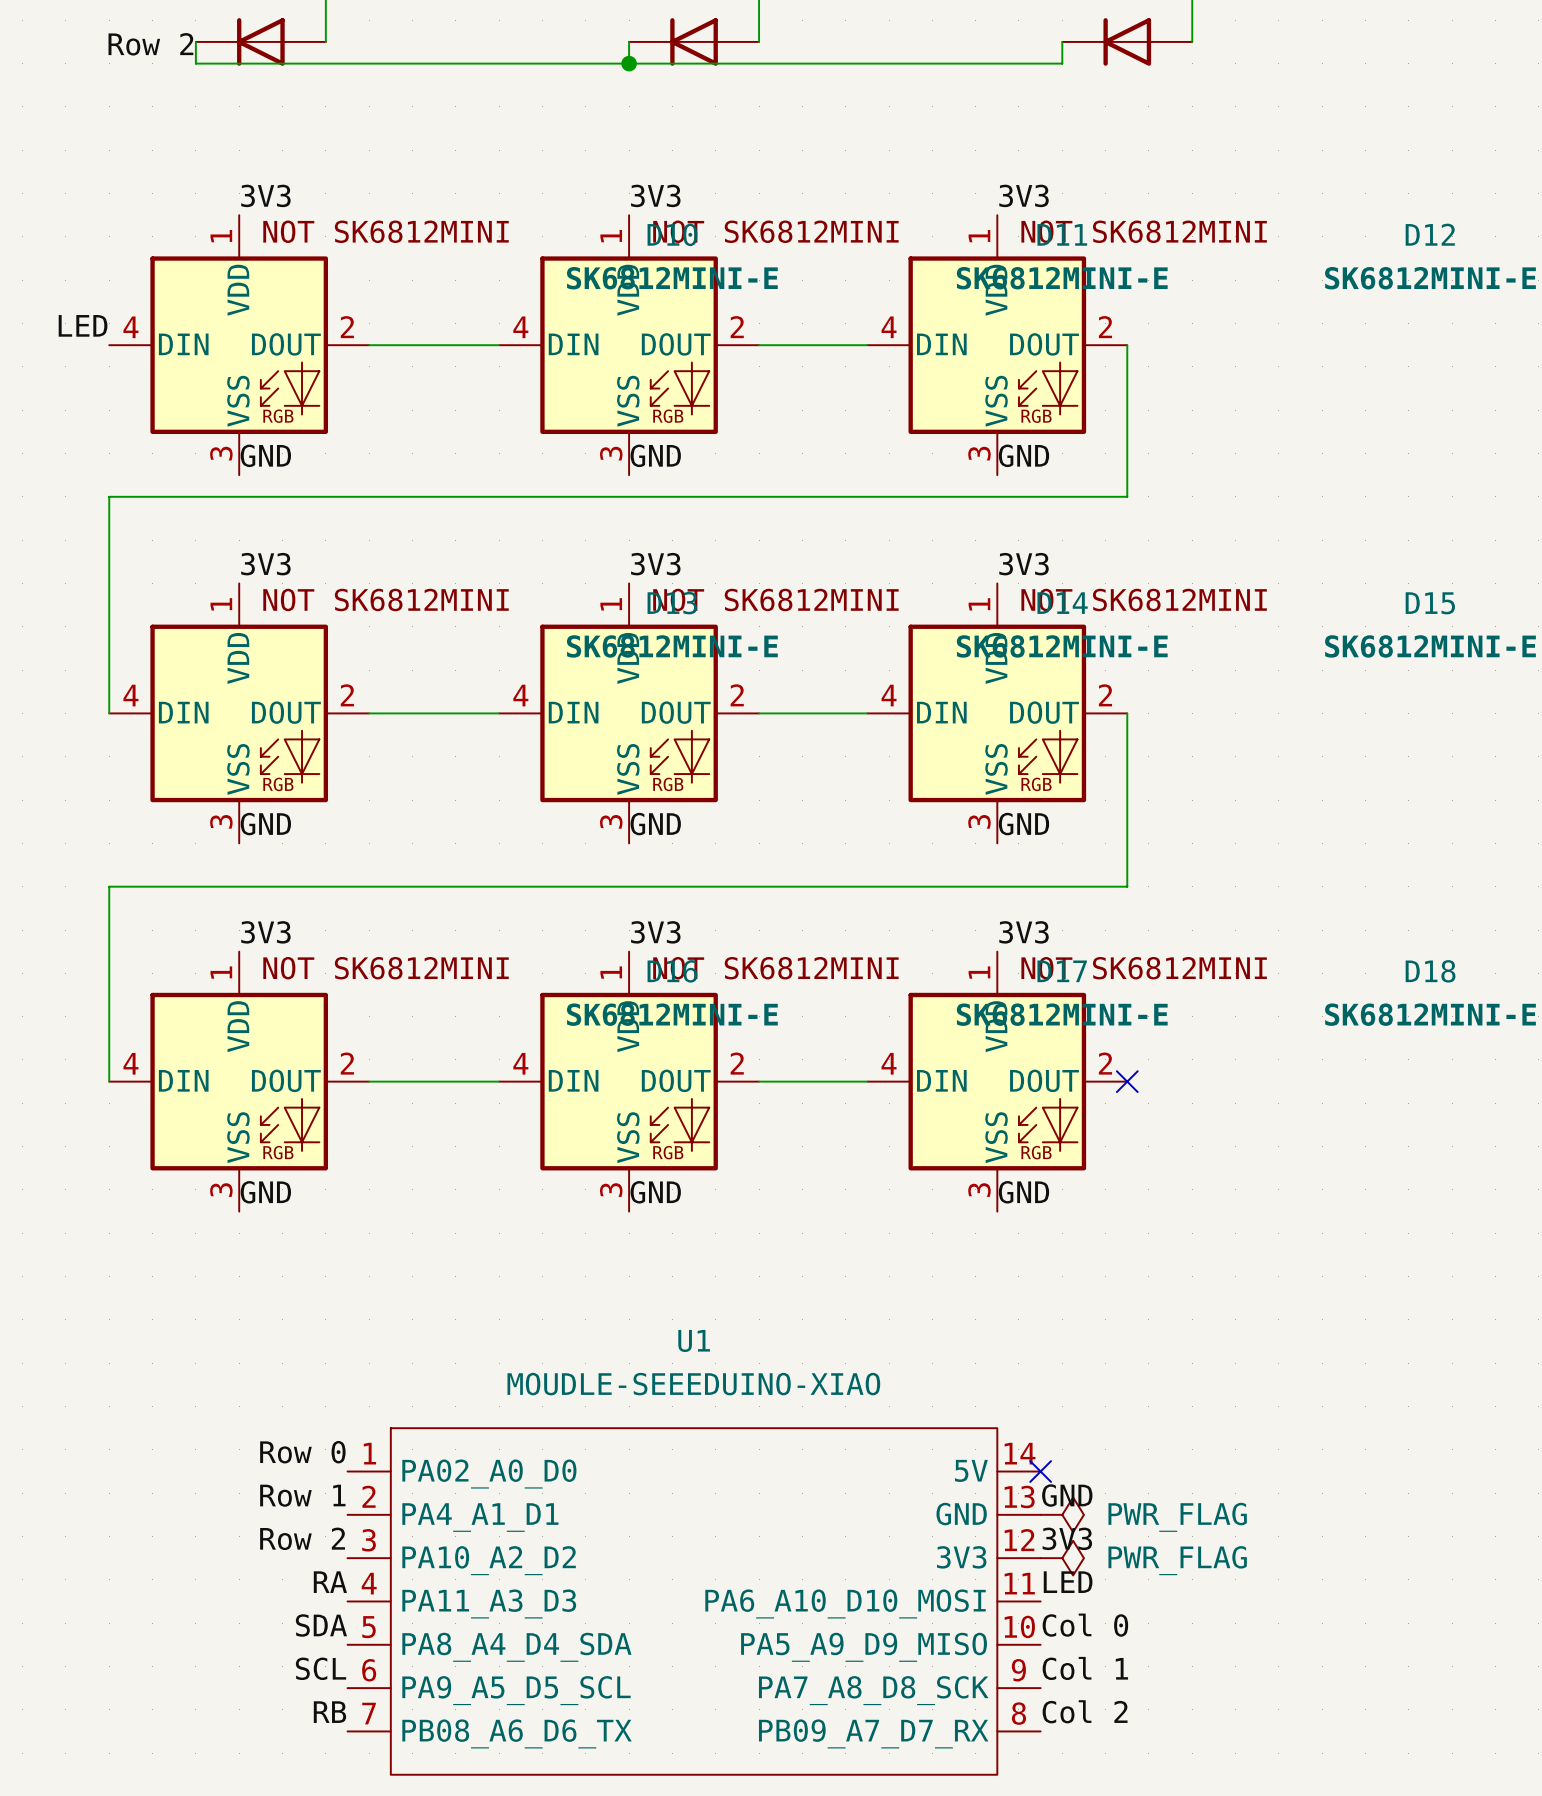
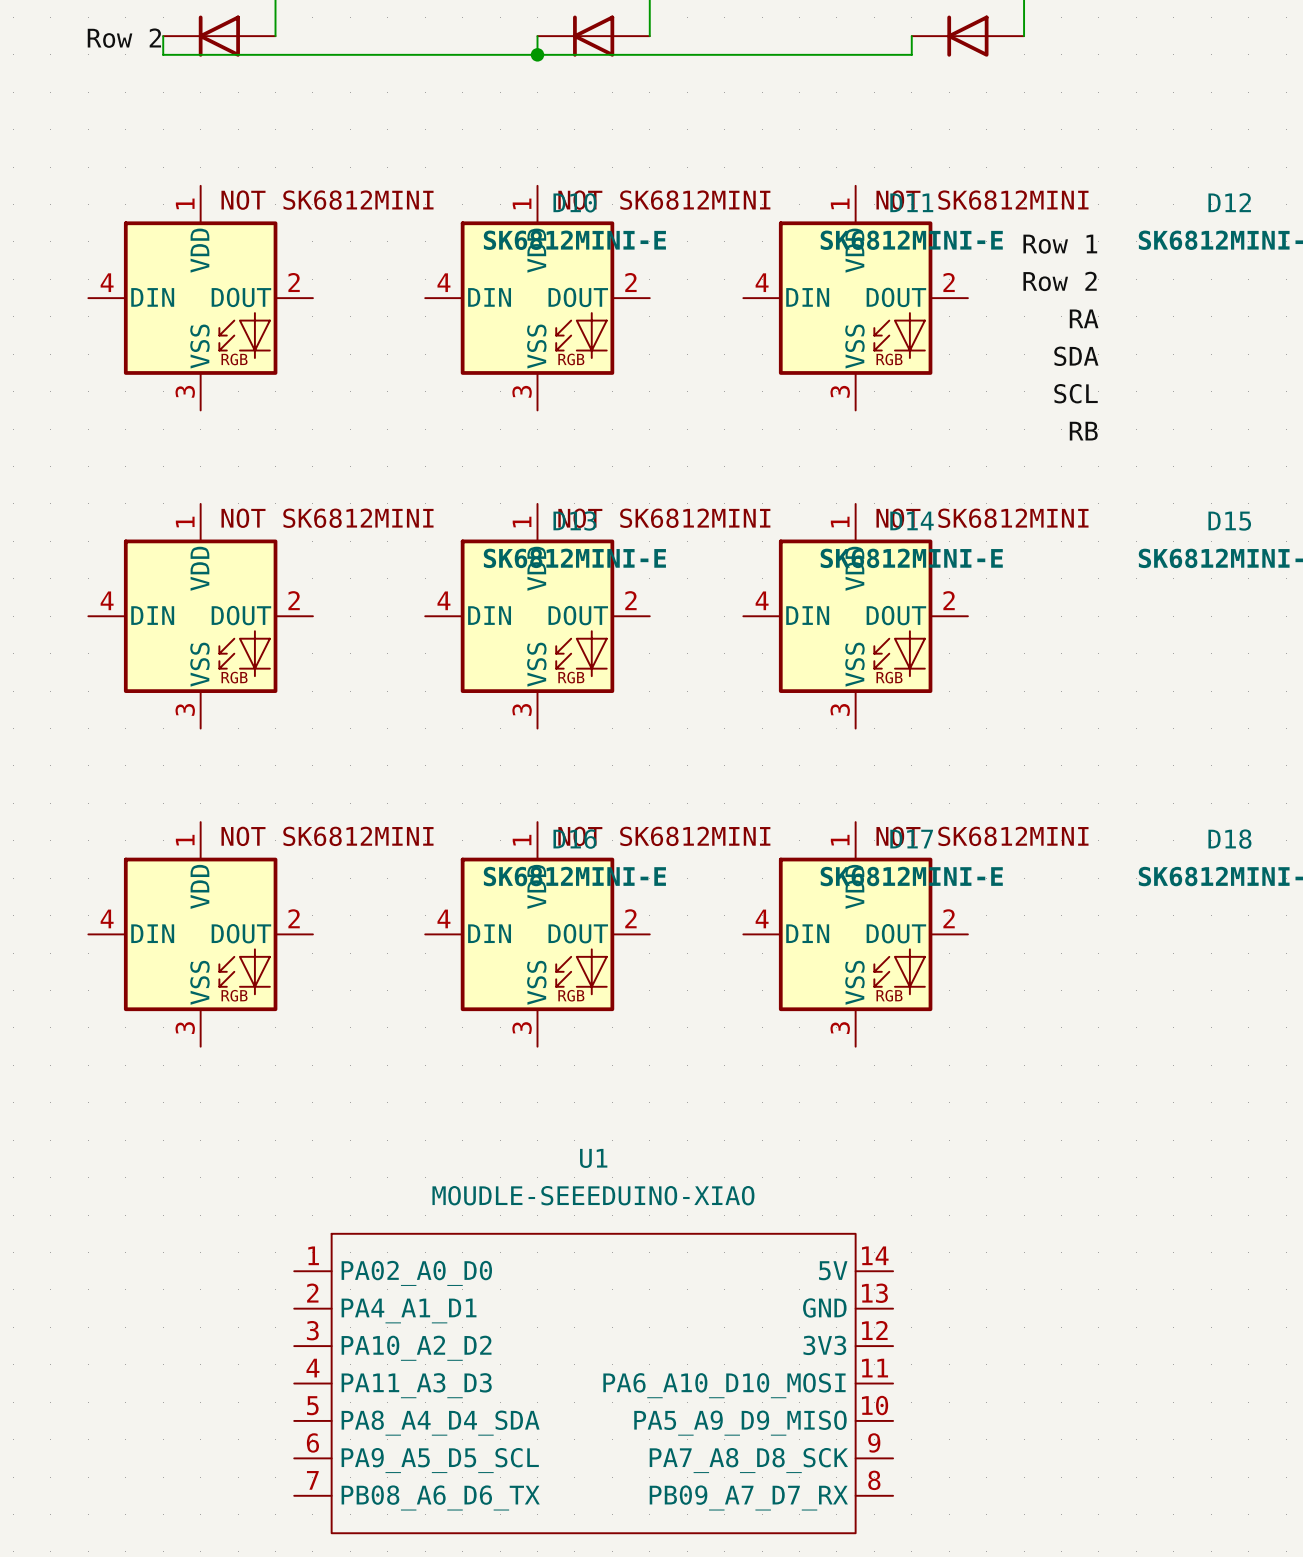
label: 3V3 (265, 195) -> none
label: 3V3 (655, 195) -> none
label: 3V3 (1024, 195) -> none
label: none -> Row 1 (1060, 244)
label: LED (83, 325) -> none
label: none -> Row 2 (1060, 281)
wire: (369, 345) (499, 345) -> none
wire: (759, 345) (867, 345) -> none
wire: (1127, 345) (1127, 496) (109, 496) (109, 713) -> none
label: none -> RA (1084, 318)
label: none -> SDA (1076, 356)
label: GND (265, 455) -> none
label: GND (655, 455) -> none
label: GND (1023, 455) -> none
label: none -> SCL (1076, 393)
label: none -> RB (1083, 431)
label: 3V3 (265, 564) -> none
label: 3V3 (655, 564) -> none
label: 3V3 (1024, 564) -> none
wire: (369, 713) (499, 713) -> none
wire: (759, 713) (867, 713) -> none
wire: (1127, 713) (1127, 886) (109, 886) (109, 1081) -> none
label: GND (265, 824) -> none
label: GND (655, 824) -> none
label: GND (1023, 824) -> none
label: 3V3 (265, 932) -> none
label: 3V3 (655, 932) -> none
label: 3V3 (1024, 932) -> none
wire: (369, 1081) (499, 1081) -> none
wire: (759, 1081) (867, 1081) -> none
no-connect mark: (1127, 1081) -> none
label: GND (265, 1192) -> none
label: GND (655, 1192) -> none
label: GND (1023, 1192) -> none
label: Row 0 (302, 1452) -> none
no-connect mark: (1040, 1471) -> none
label: Row 1 (302, 1495) -> none
label: GND (1067, 1495) -> none
power symbol: PWR_FLAG (1062, 1514) -> none
label: Row 2 (302, 1538) -> none
label: 3V3 (1067, 1538) -> none
power symbol: PWR_FLAG (1062, 1558) -> none
label: RA (330, 1582) -> none
label: LED (1068, 1582) -> none
label: SDA (321, 1625) -> none
label: Col 0 (1085, 1625) -> none
label: SCL (321, 1668) -> none
label: Col 1 (1085, 1668) -> none
label: Col 2 (1085, 1711) -> none
label: RB (329, 1712) -> none

